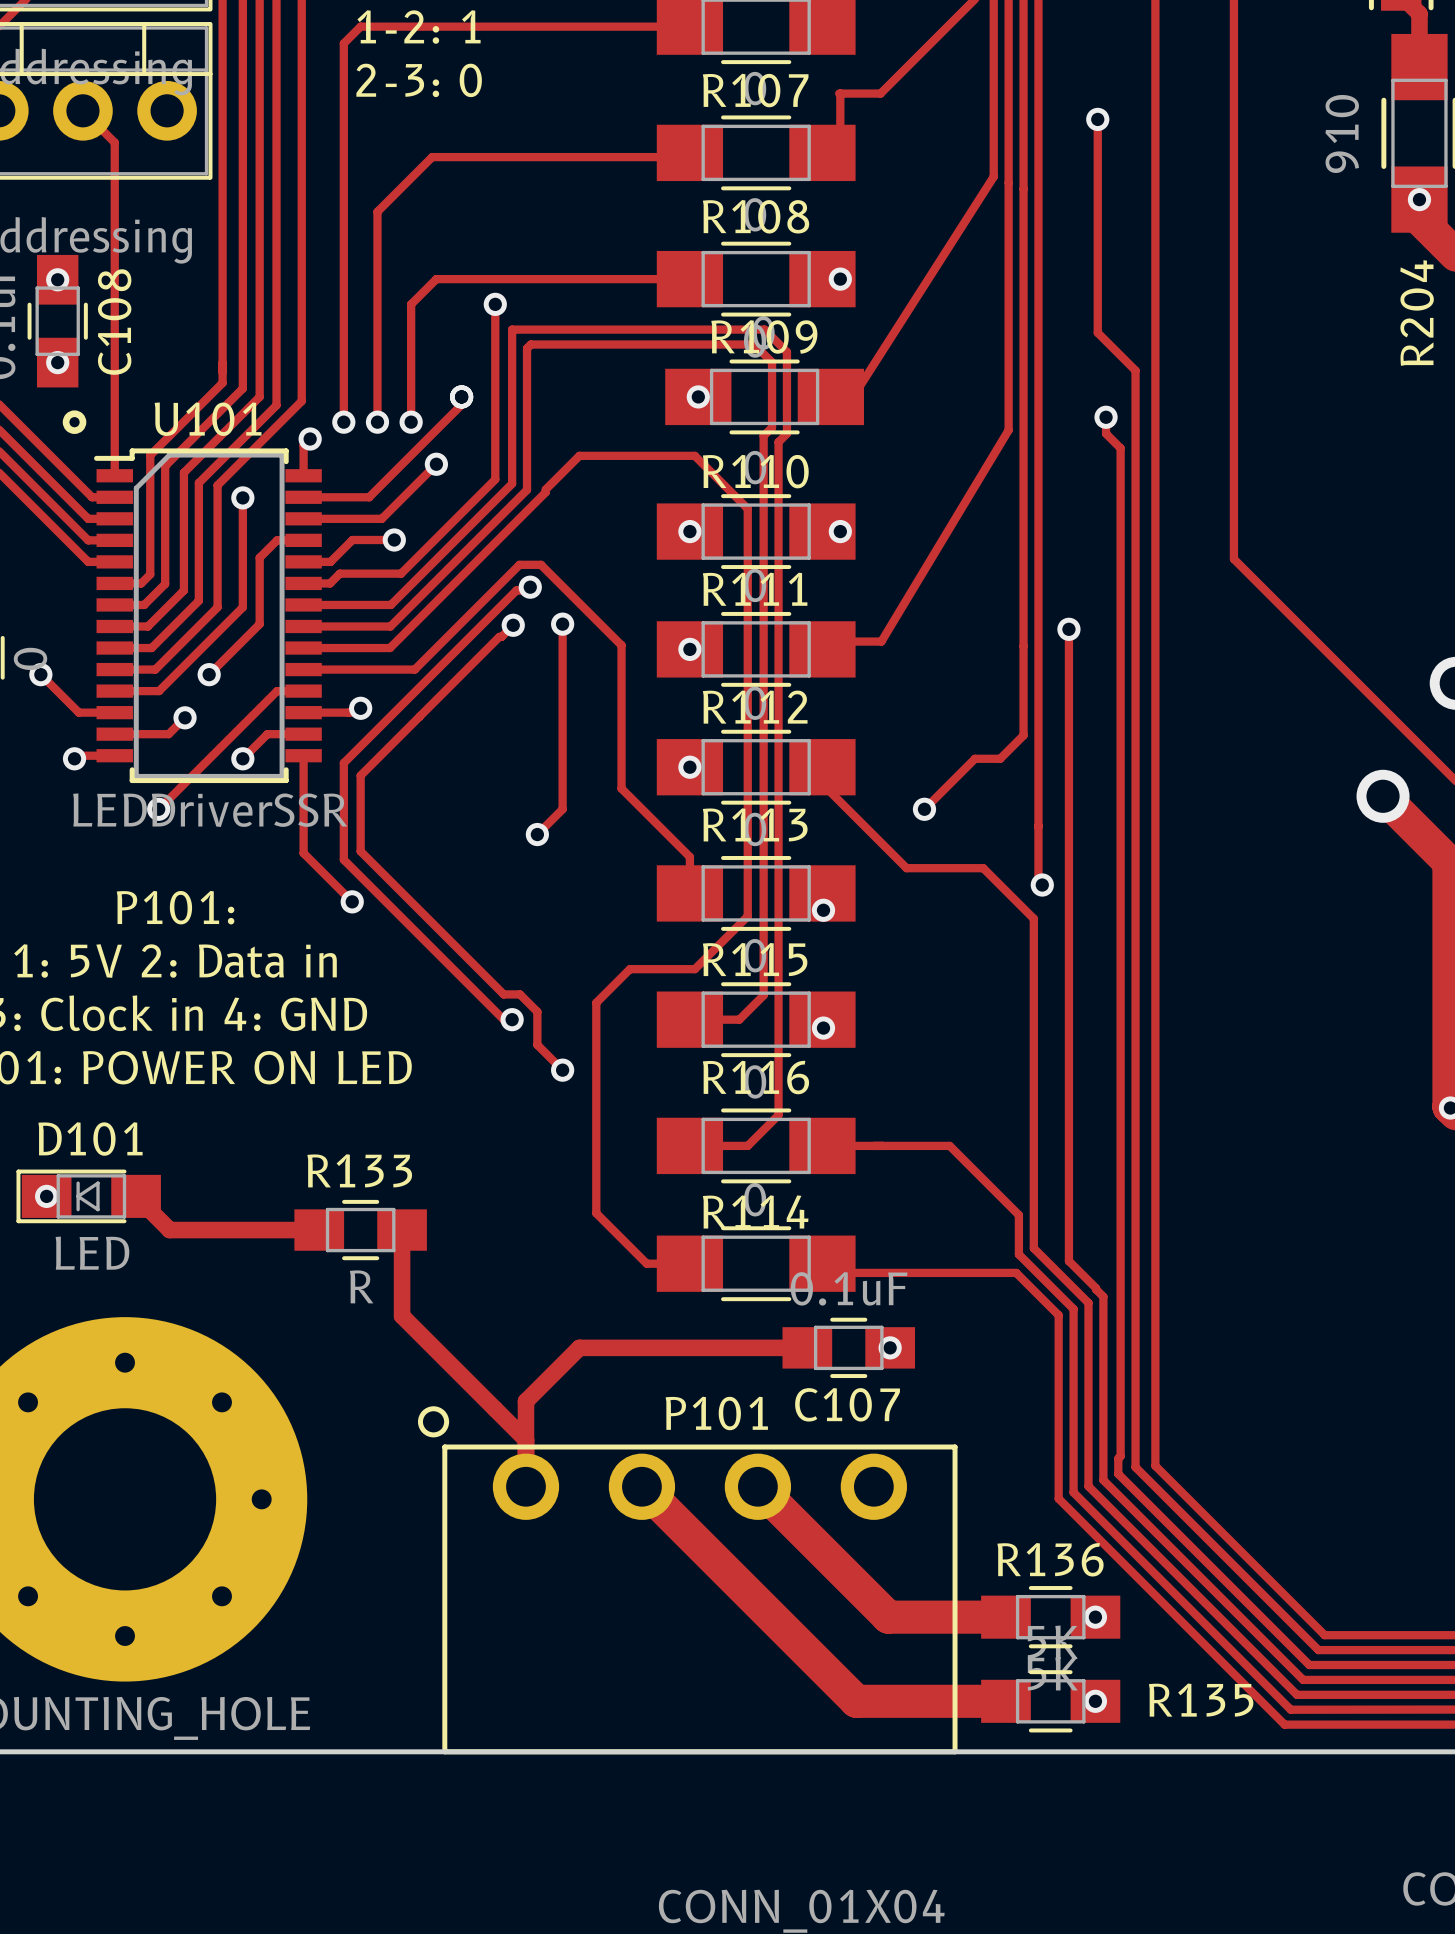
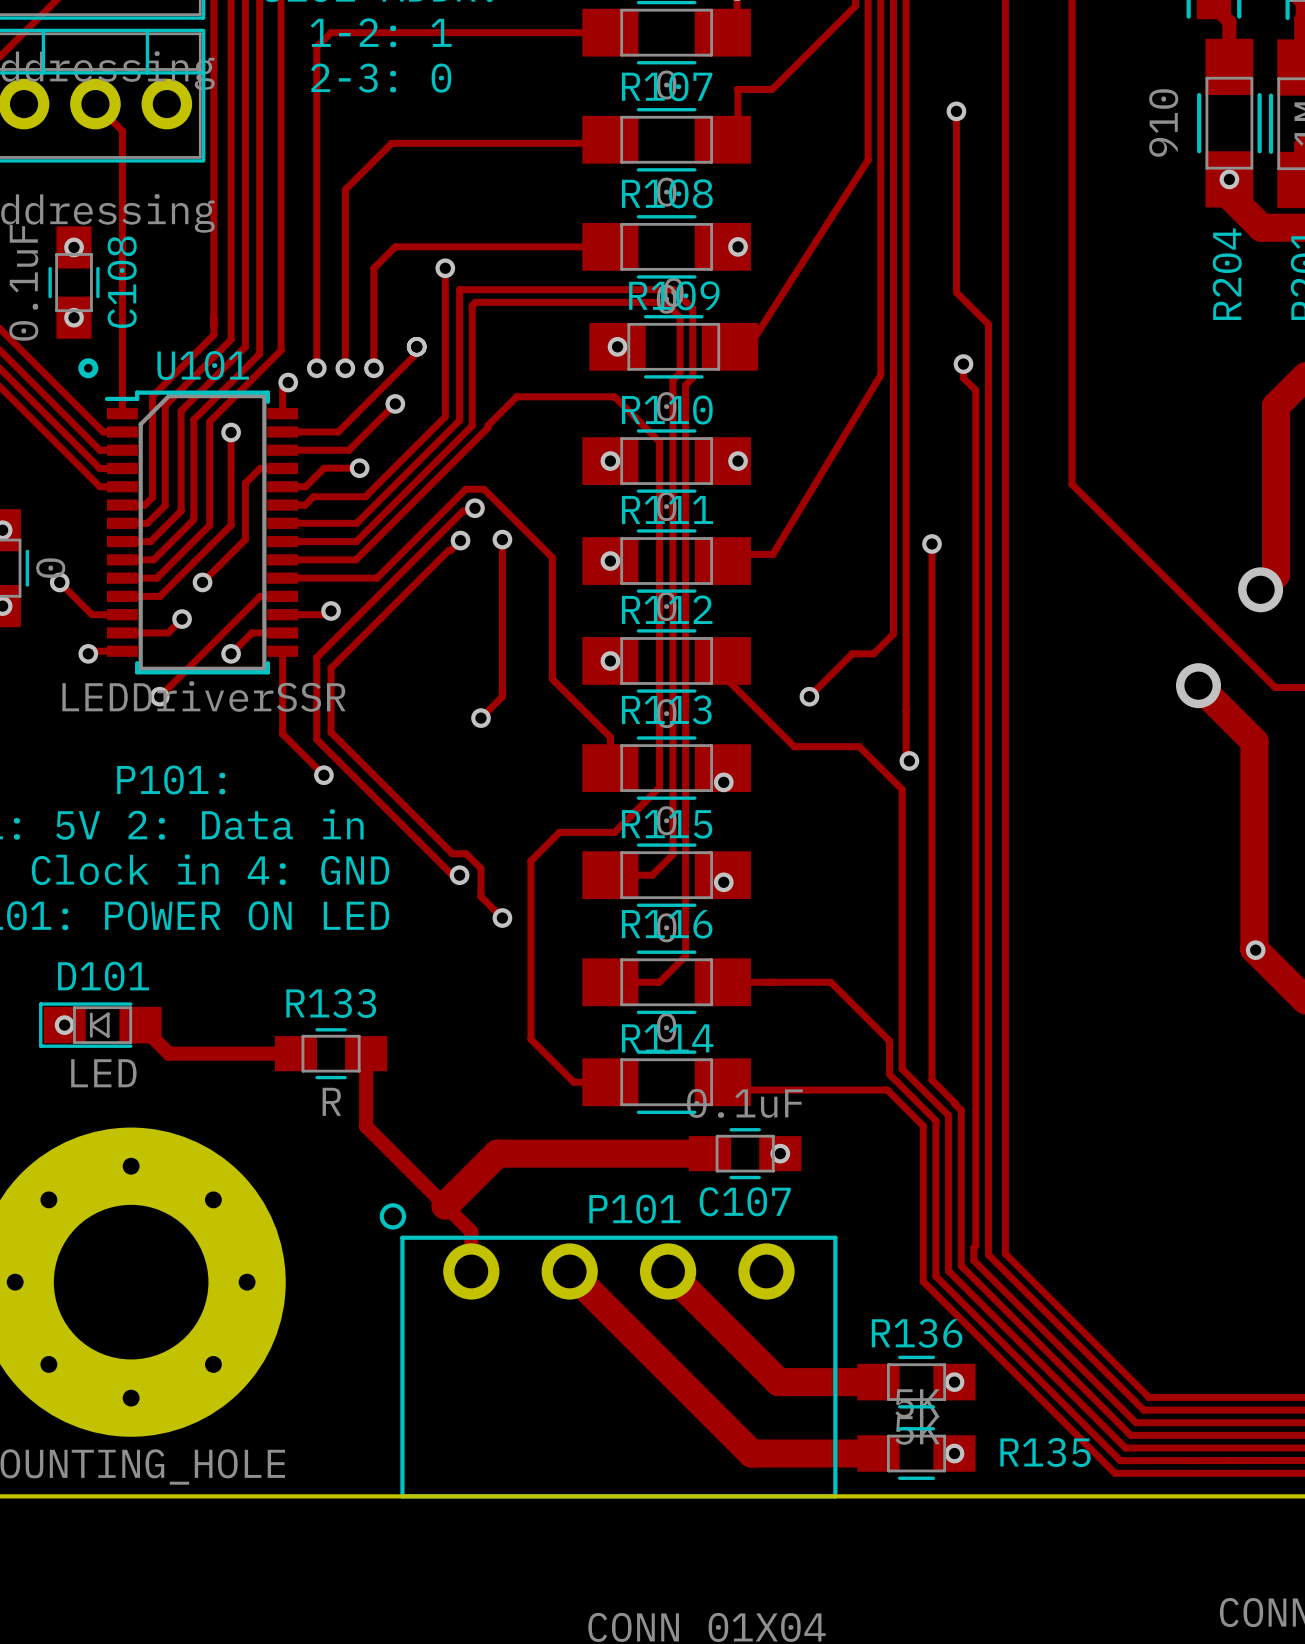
track: (579, 1347) (525, 1401) (525, 1439) -> (516, 1153) (497, 1153) (445, 1205)
track width: thin (579, 1347) (807, 1347) -> thick (516, 1153) (710, 1153)

